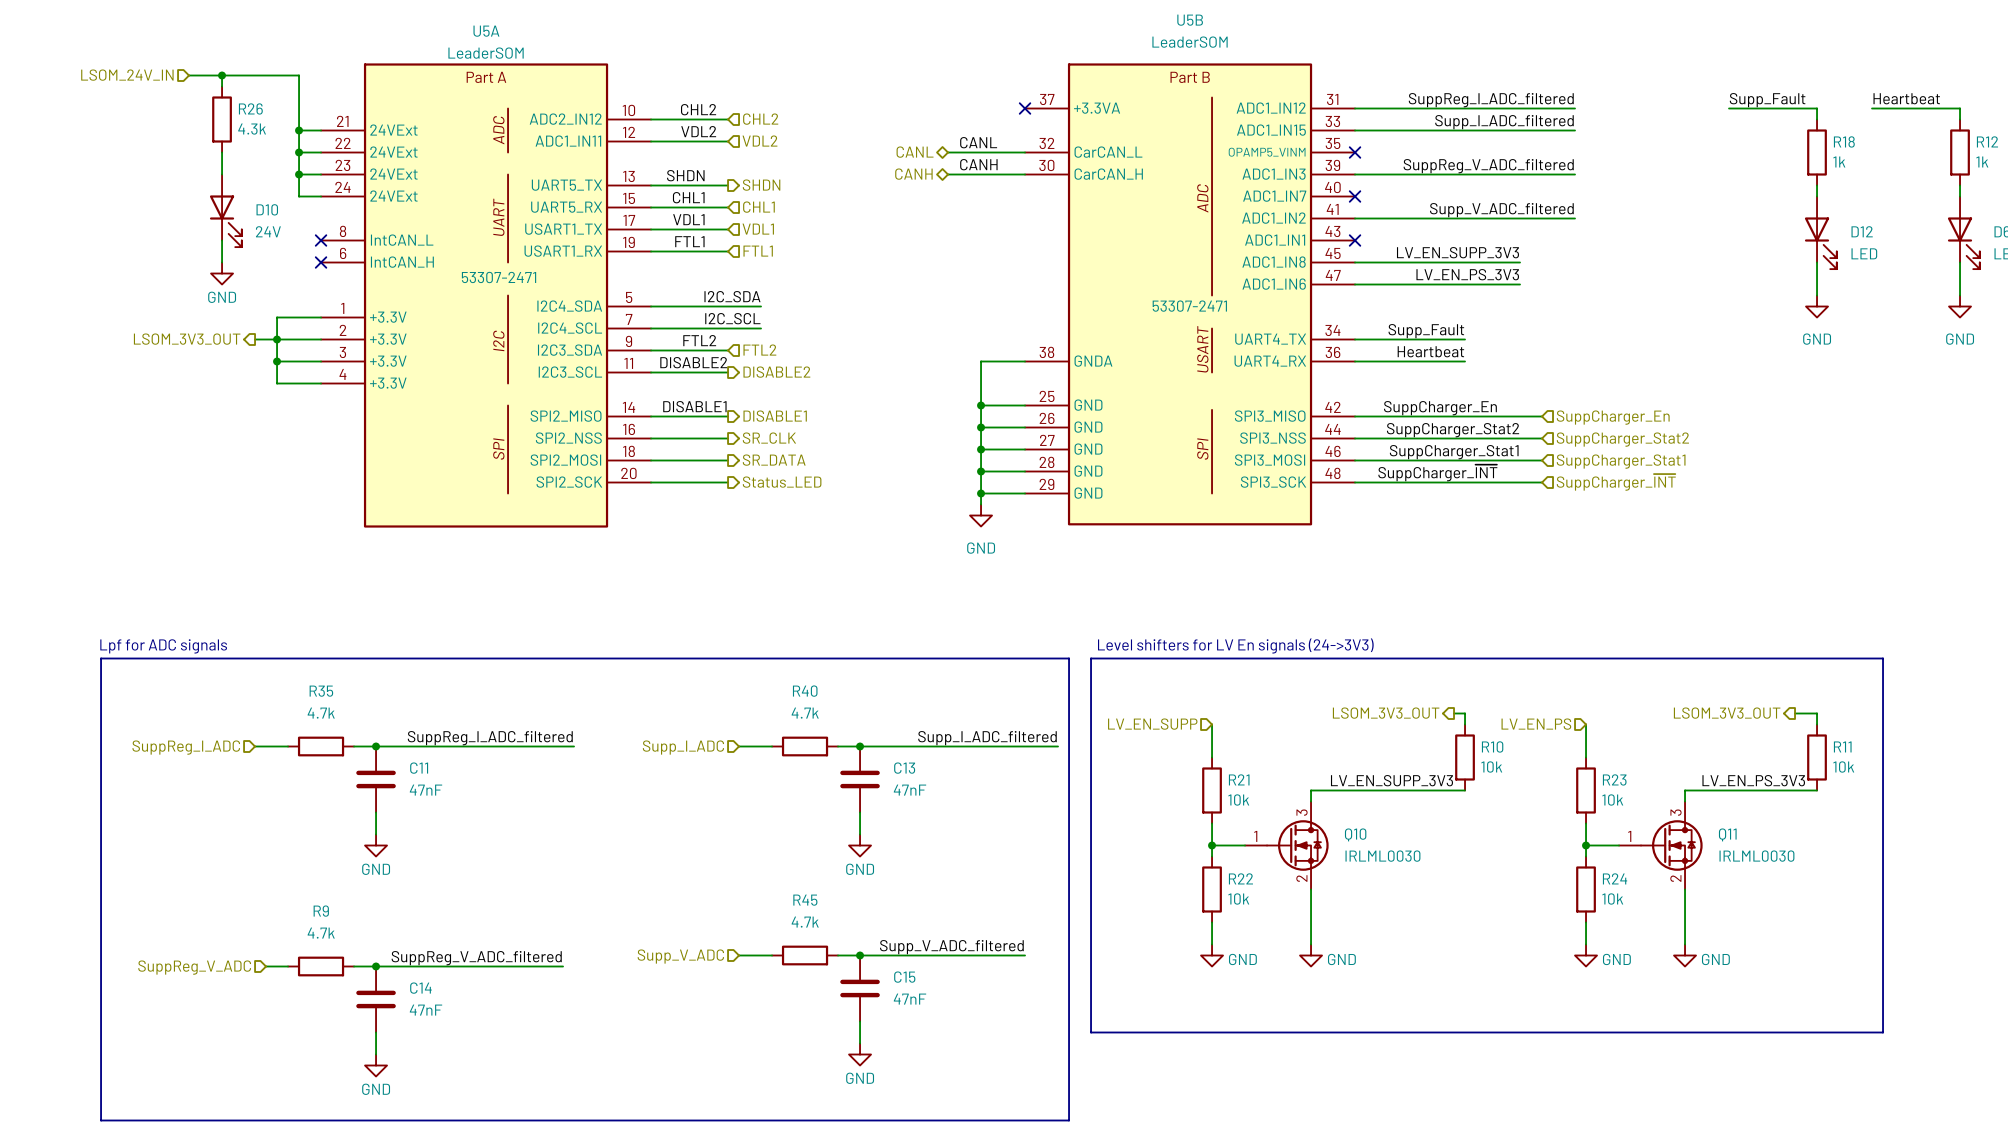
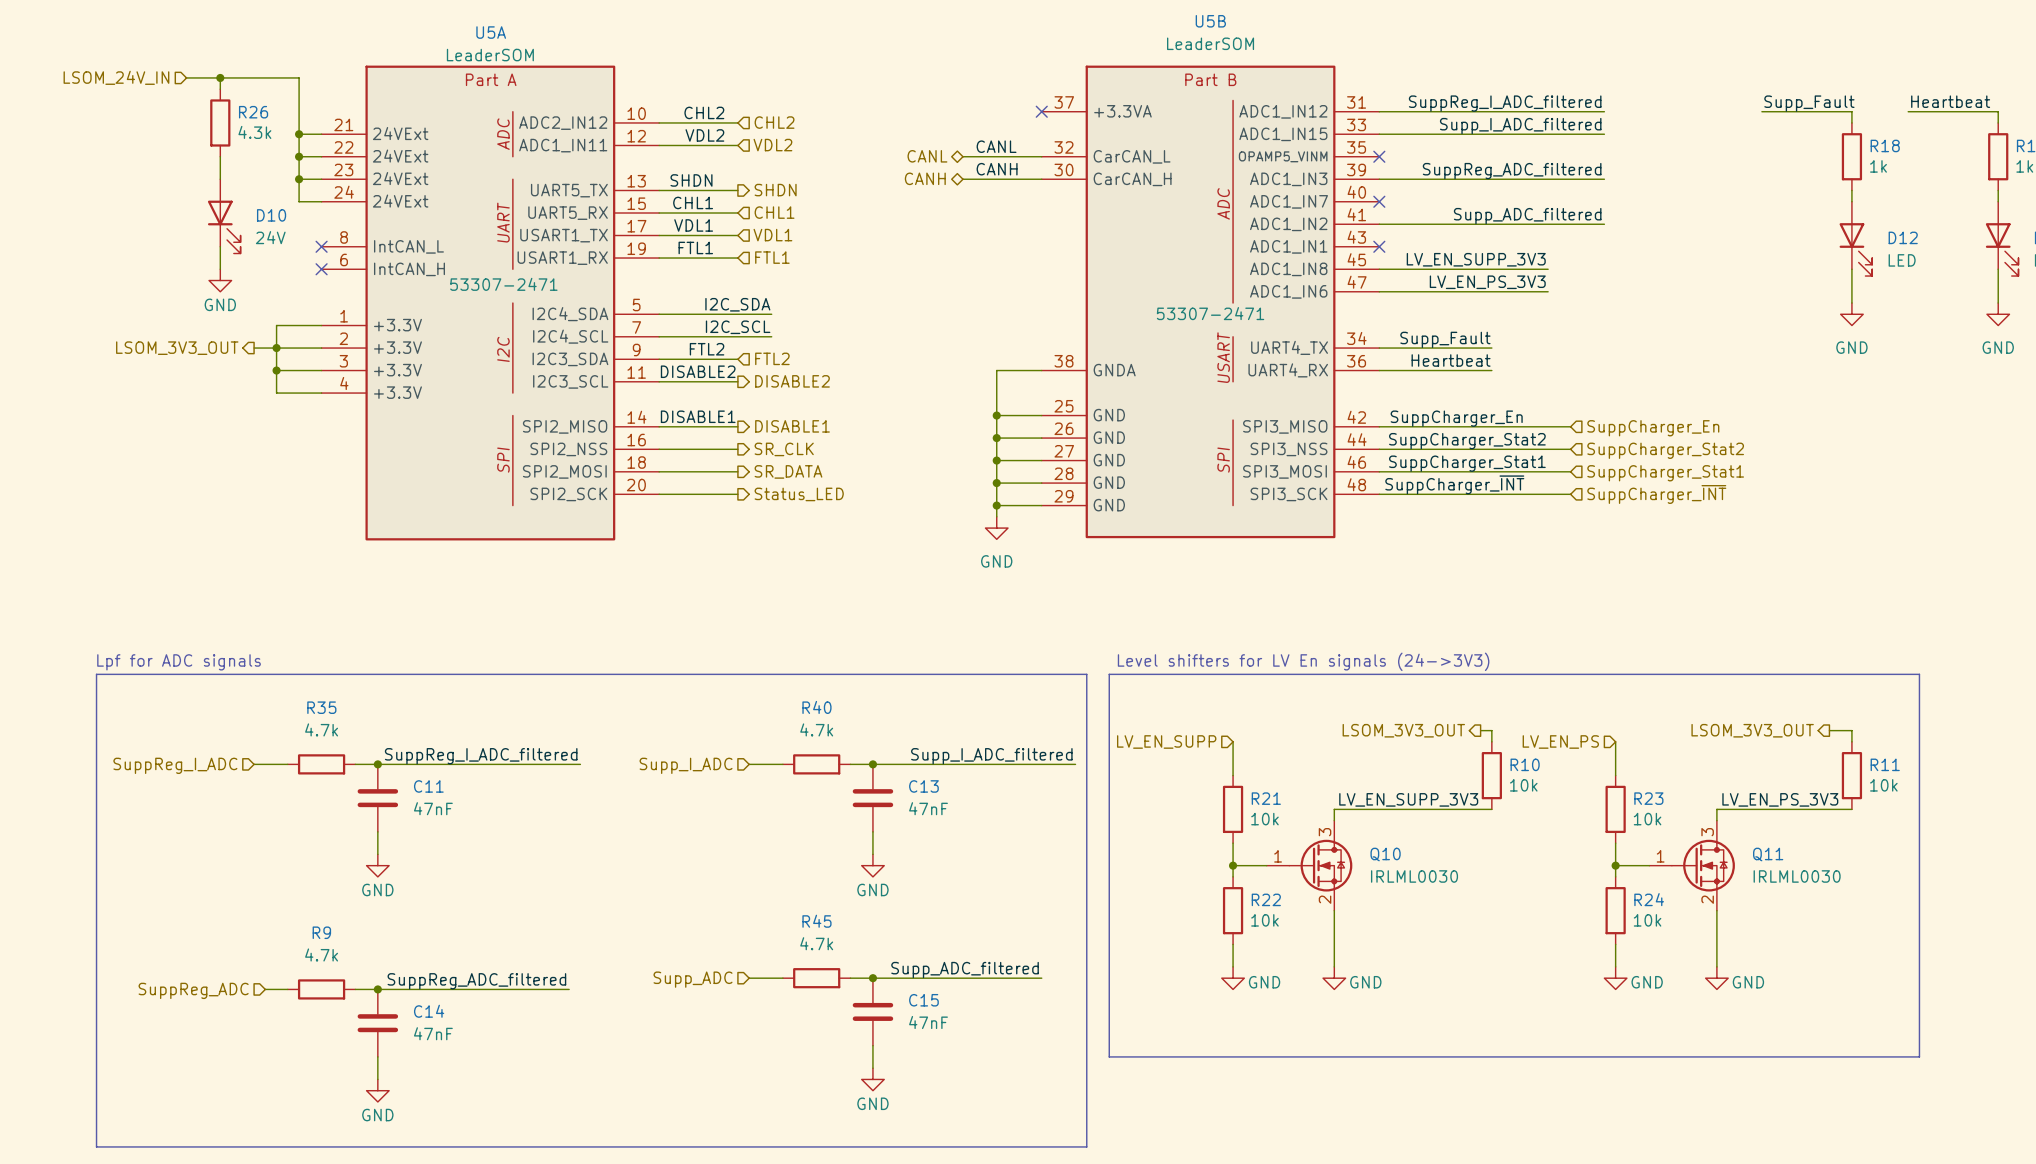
label: SuppReg_V_ADC_filtered (1488, 166) -> SuppReg_ADC_filtered (1512, 171)
label: Supp_V_ADC_filtered (1501, 210) -> Supp_ADC_filtered (1527, 216)
label: Supp_V_ADC_filtered (951, 947) -> Supp_ADC_filtered (965, 970)
hierarchical label: Supp_V_ADC (680, 956) -> Supp_ADC (693, 979)
label: SuppReg_V_ADC_filtered (476, 958) -> SuppReg_ADC_filtered (476, 981)
hierarchical label: SuppReg_V_ADC (194, 967) -> SuppReg_ADC (193, 990)

